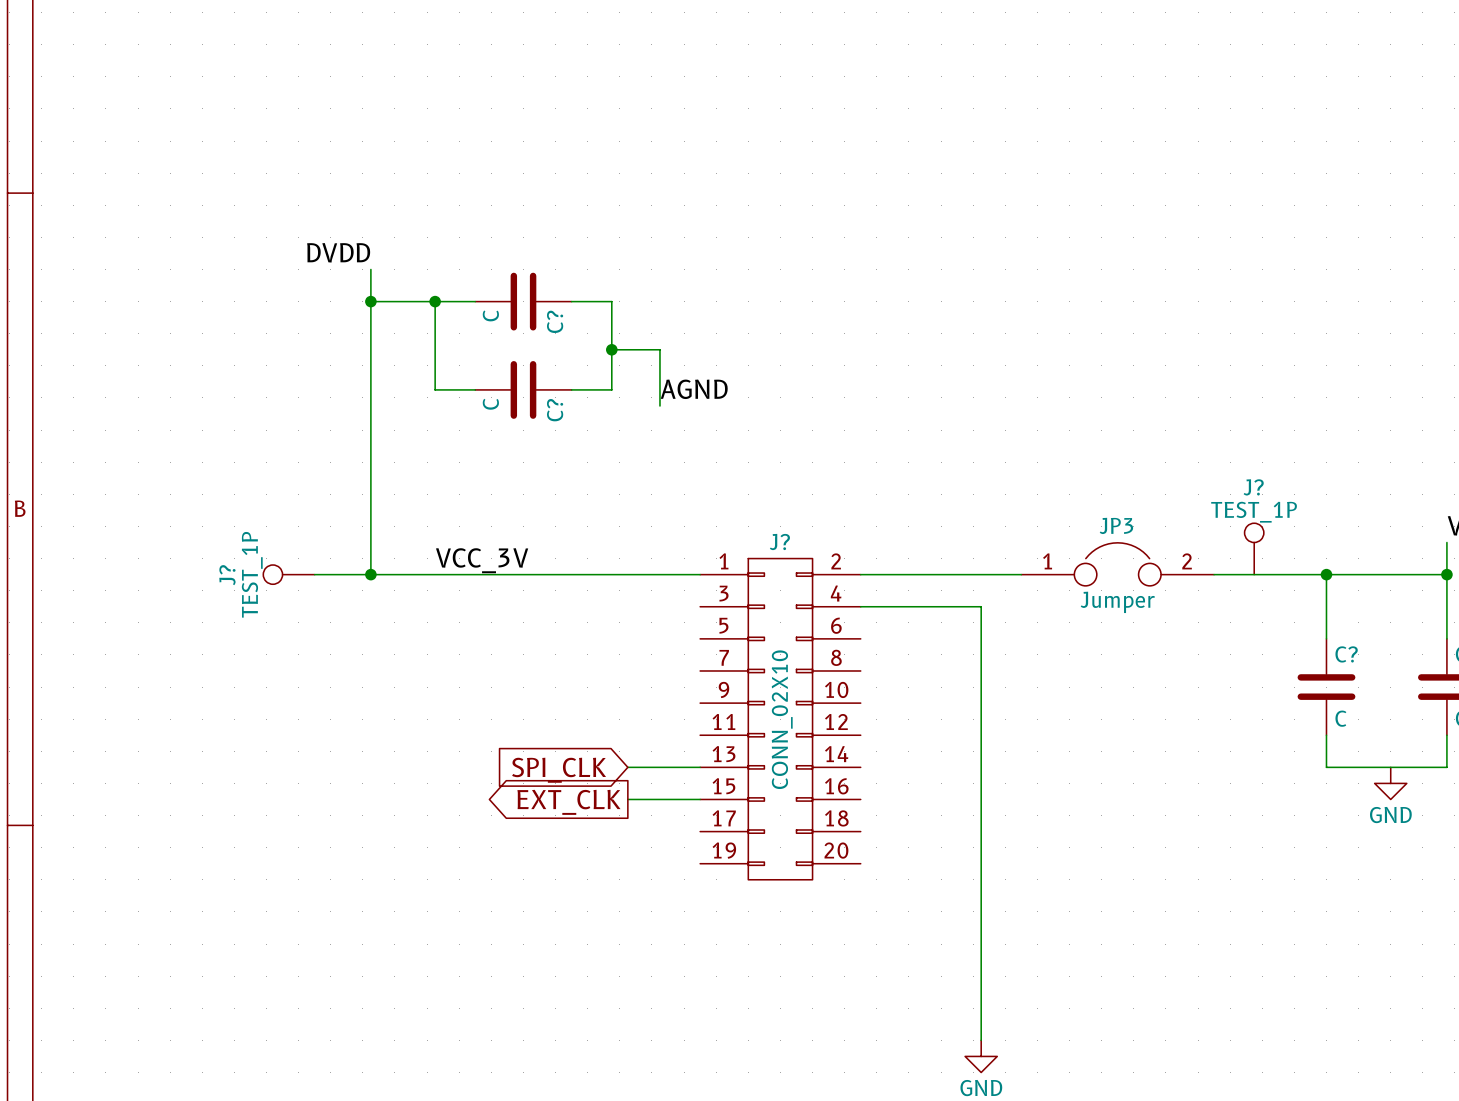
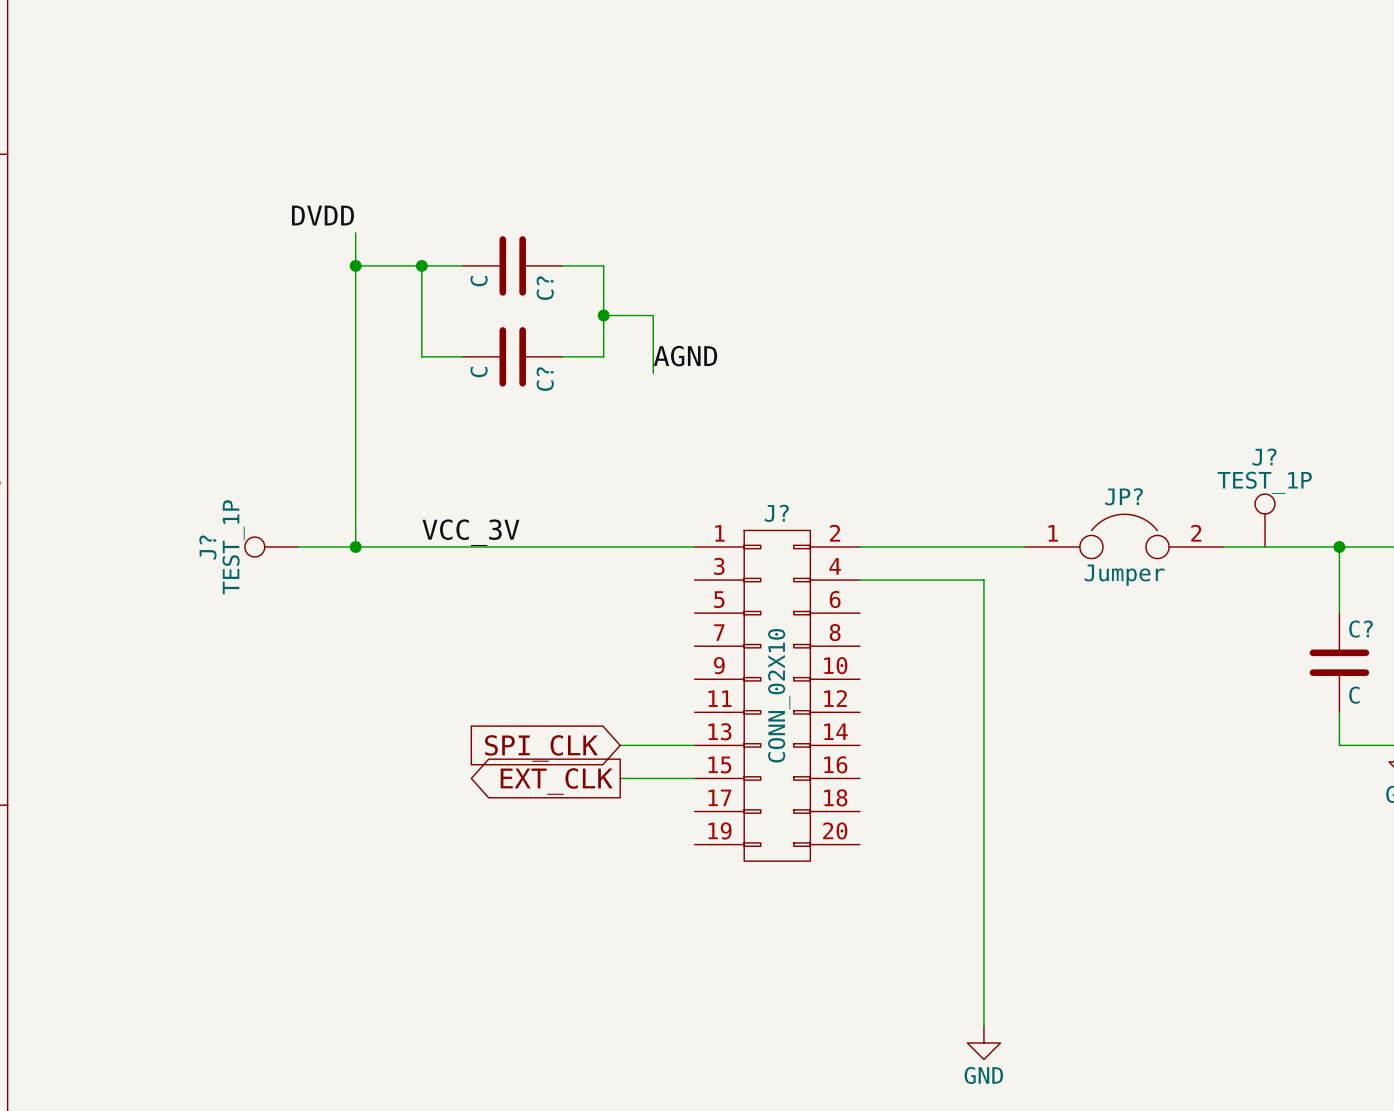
JP3 name: JP3 (1116, 525) -> JP? (1124, 496)

